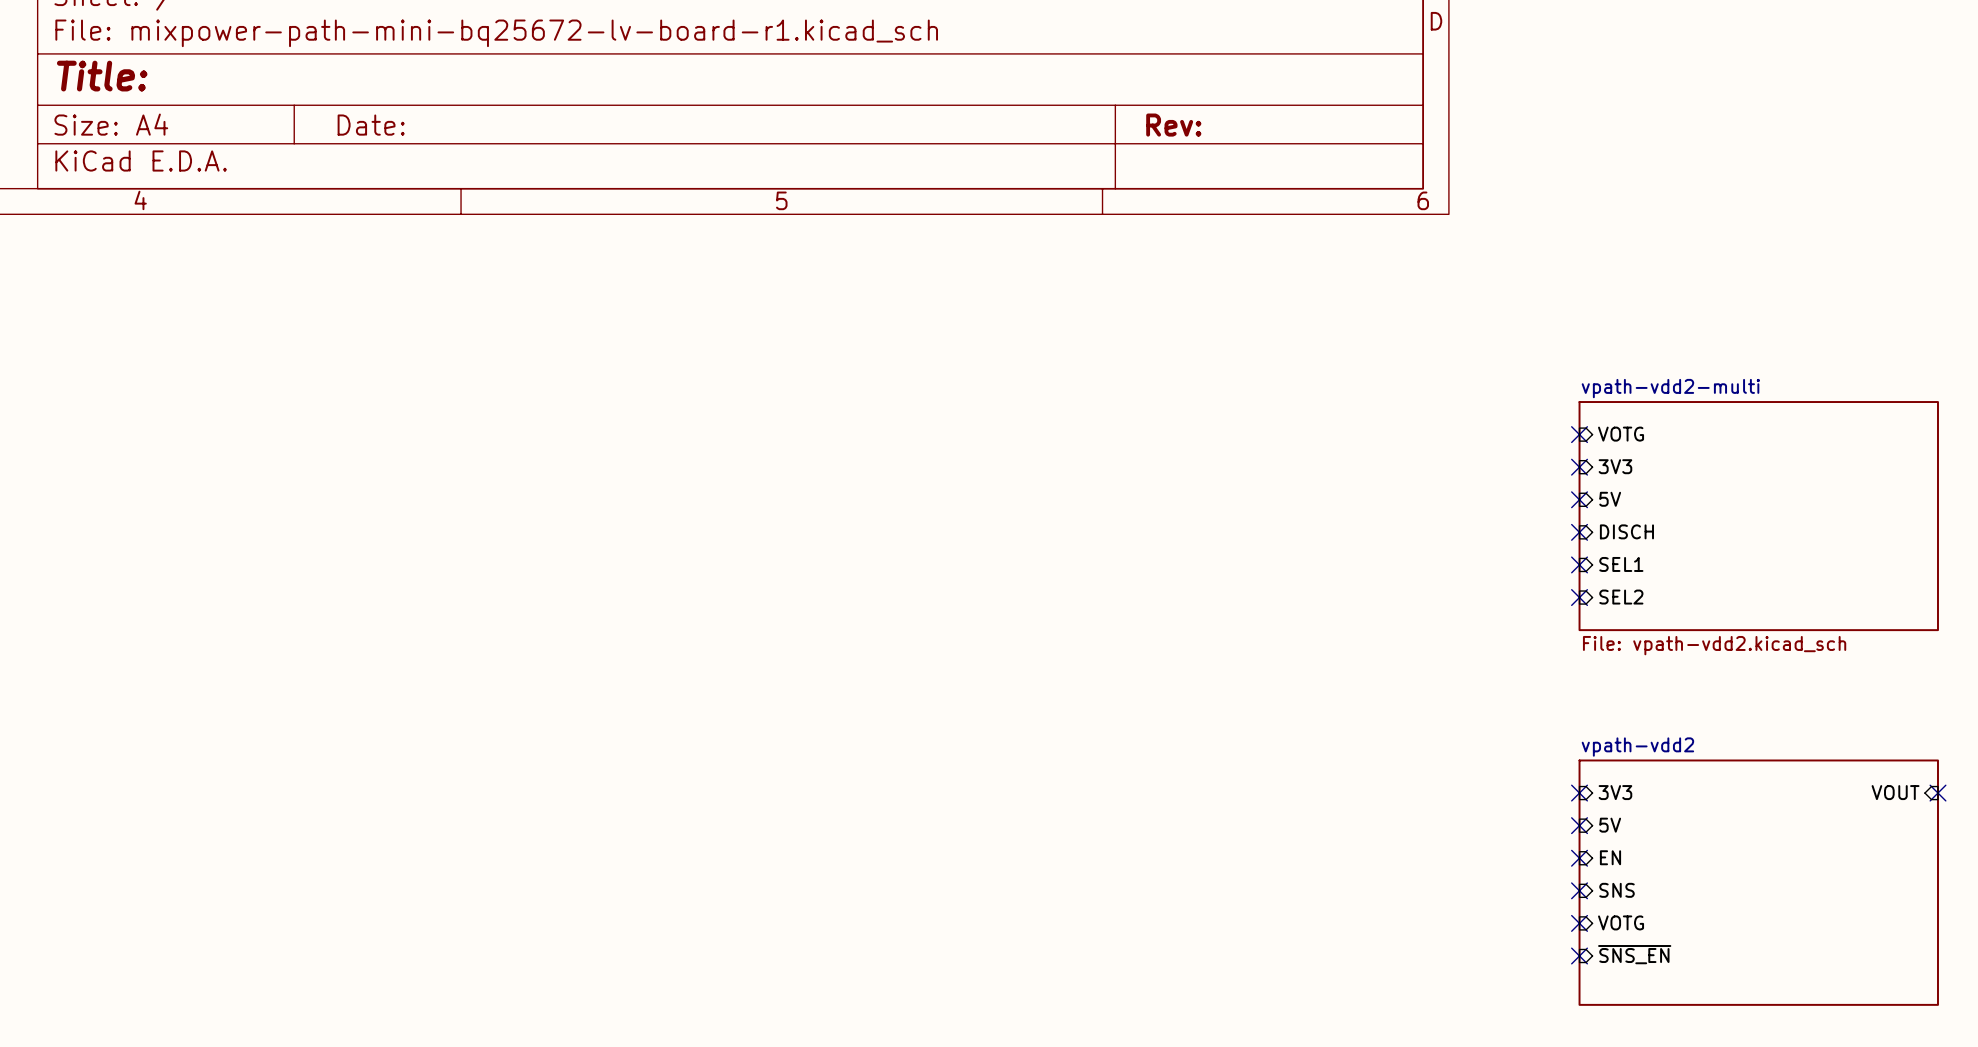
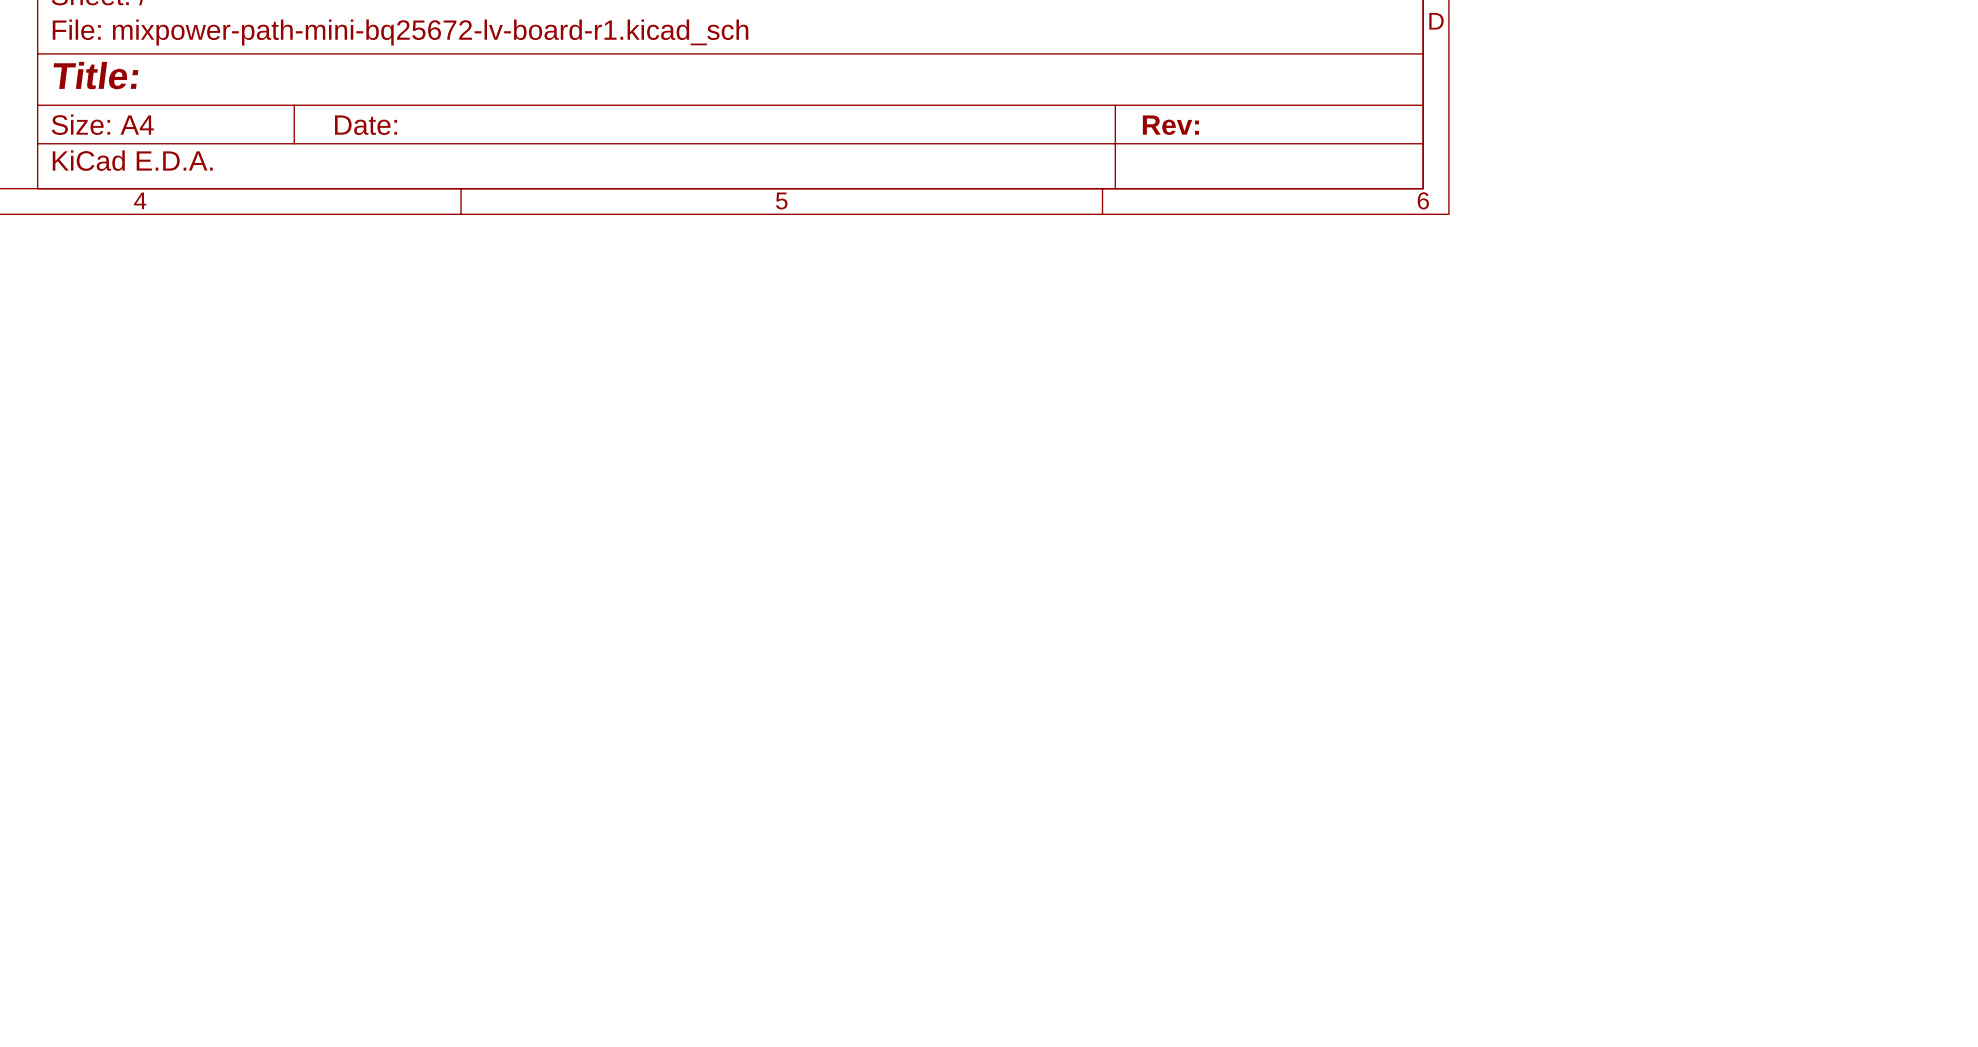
no-connect mark: (1579, 434) -> none
sheet pin: VOTG (1621, 434) -> none
sheet pin: 3V3 (1615, 466) -> none
no-connect mark: (1579, 467) -> none
no-connect mark: (1579, 499) -> none
sheet pin: 5V (1610, 499) -> none
sheet vpath-vdd2-multi: File: vpath-vdd2.kicad_sch (1758, 516) -> none
sheet pin: DISCH (1626, 531) -> none
no-connect mark: (1579, 532) -> none
no-connect mark: (1579, 564) -> none
sheet pin: SEL1 (1621, 564) -> none
no-connect mark: (1579, 597) -> none
sheet pin: SEL2 (1621, 597) -> none
sheet pin: 3V3 (1615, 792) -> none
sheet pin: VOUT (1895, 792) -> none
no-connect mark: (1579, 793) -> none
no-connect mark: (1937, 793) -> none
no-connect mark: (1579, 825) -> none
sheet pin: 5V (1610, 825) -> none
sheet pin: EN (1610, 857) -> none
no-connect mark: (1579, 858) -> none
sheet vpath-vdd2: (1758, 882) -> none
no-connect mark: (1579, 890) -> none
sheet pin: SNS (1617, 890) -> none
sheet pin: VOTG (1621, 922) -> none
no-connect mark: (1579, 923) -> none
sheet pin: ~{SNS_EN} (1634, 954) -> none
no-connect mark: (1579, 956) -> none

